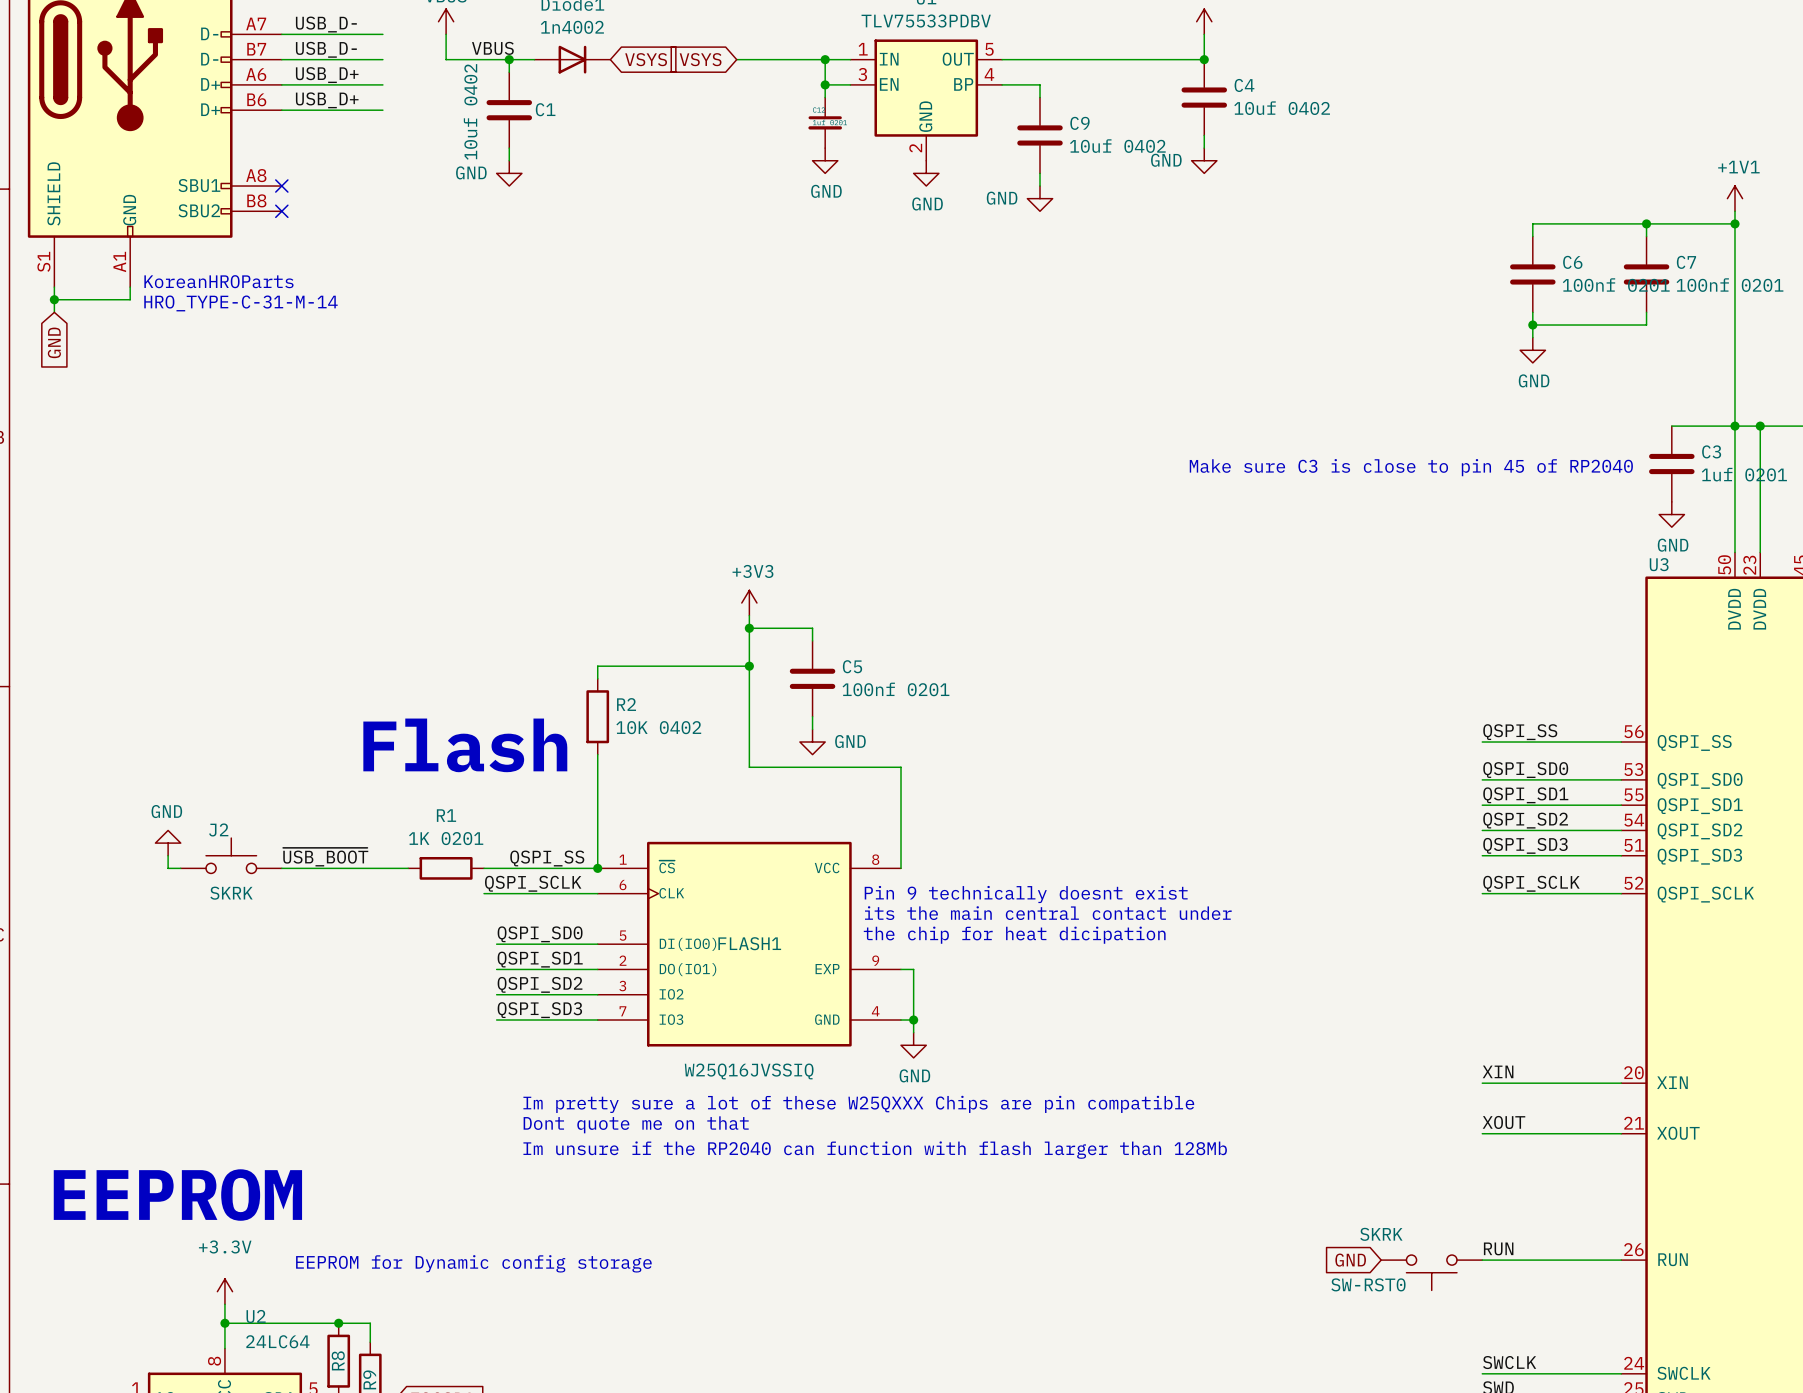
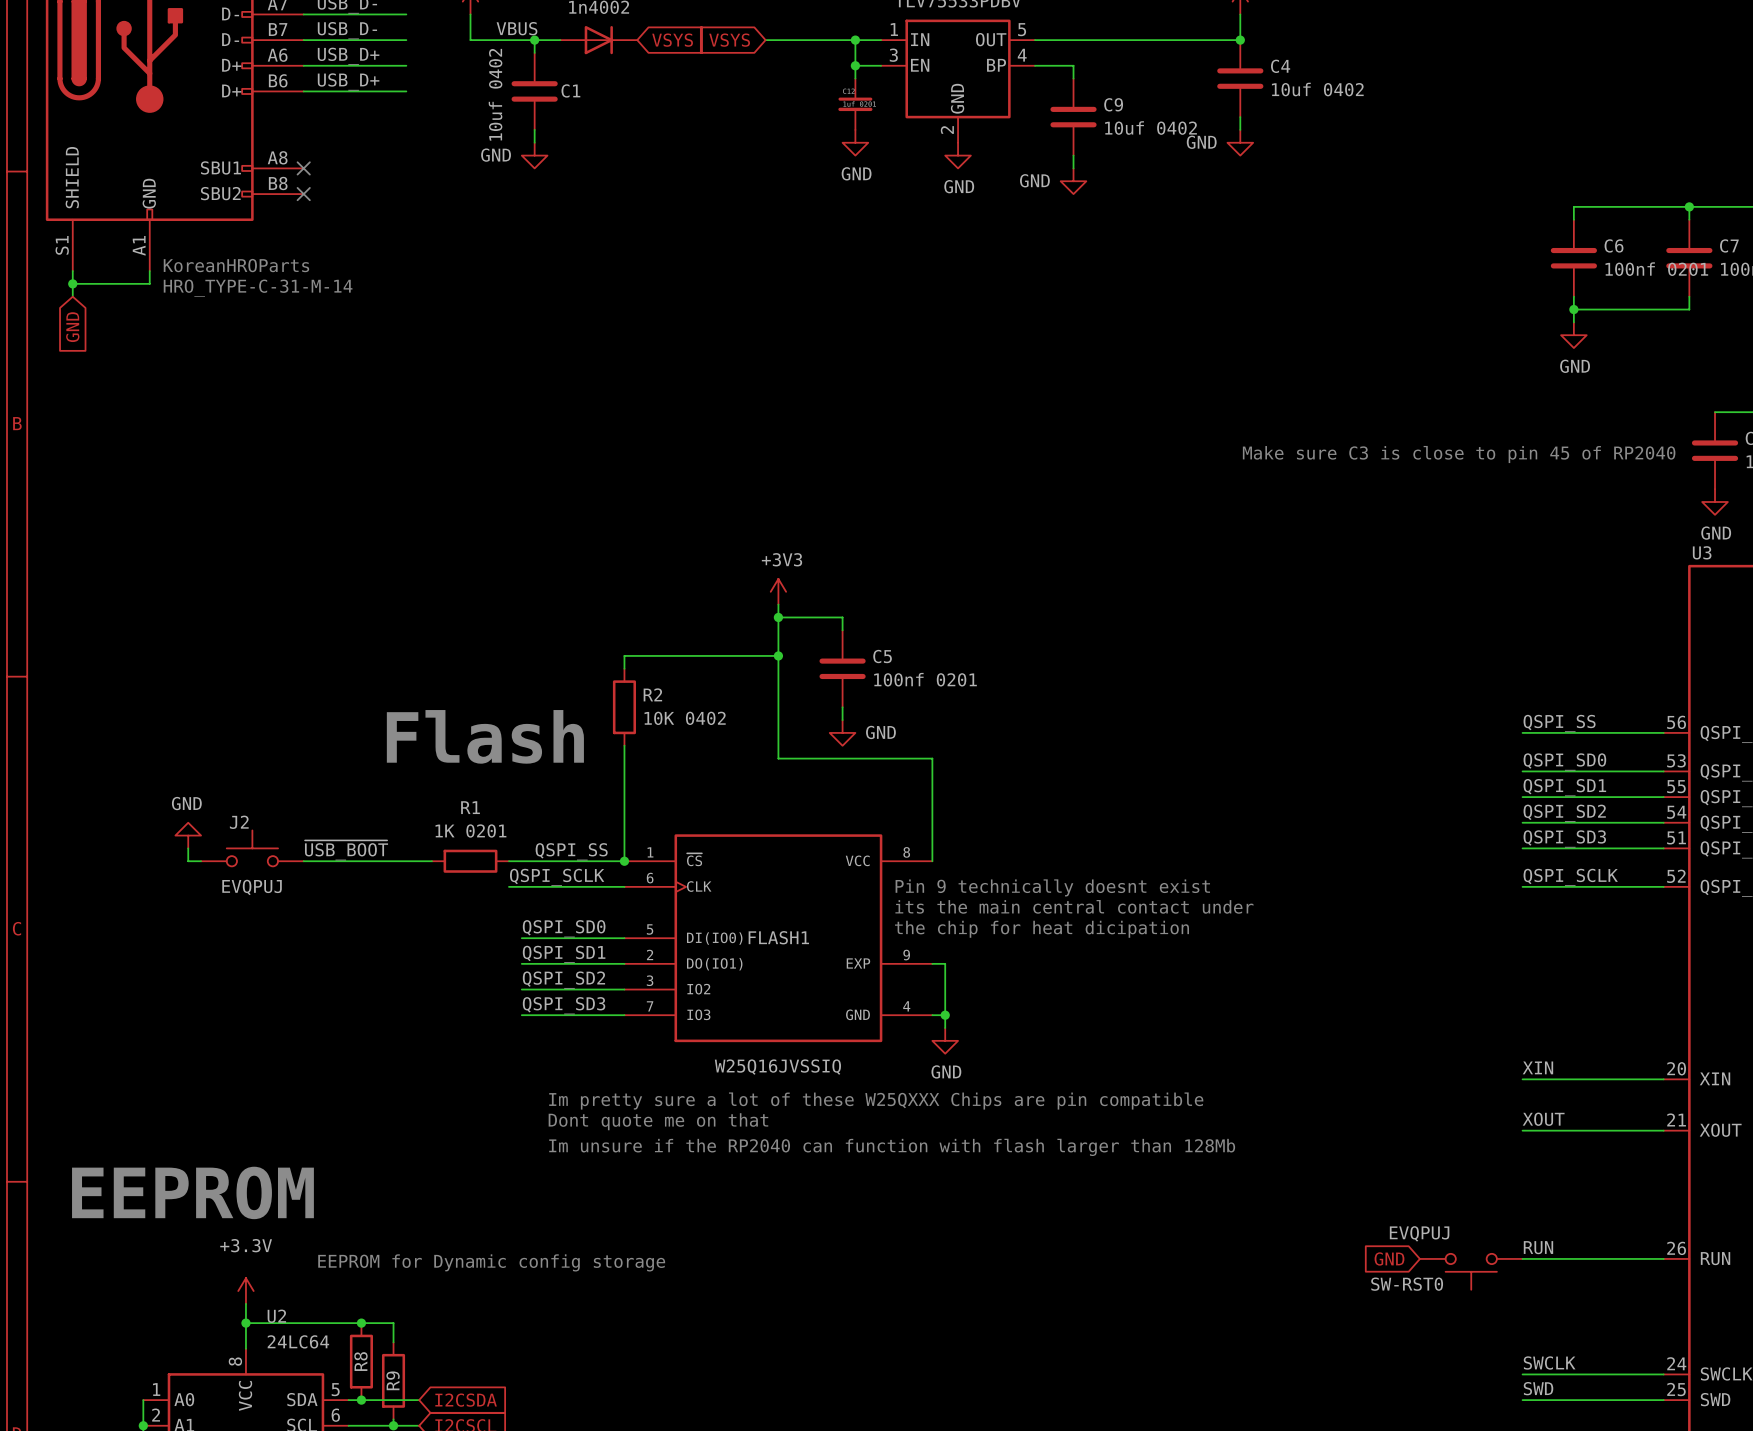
J2 value: SKRK (231, 893) -> EVQPUJ (252, 887)
SW-RST0 value: SKRK (1381, 1234) -> EVQPUJ (1419, 1233)

